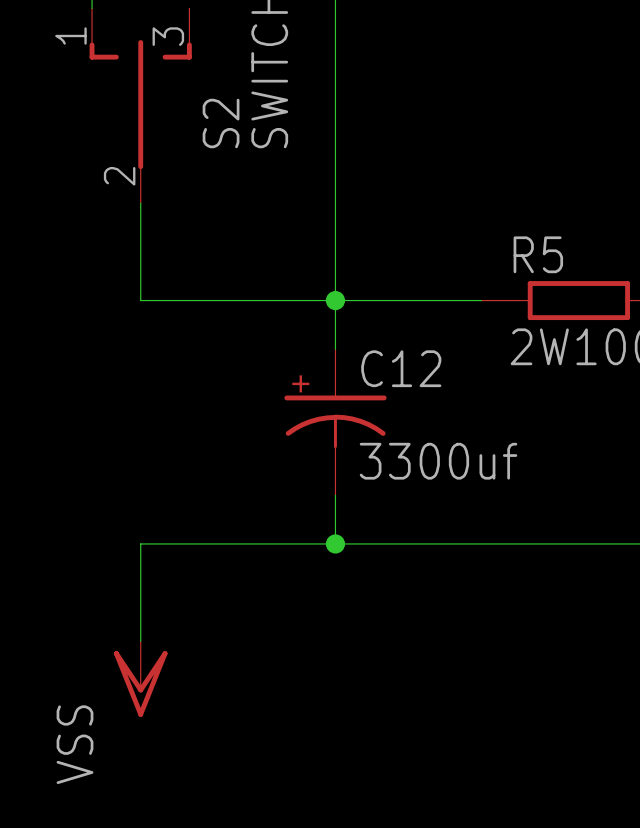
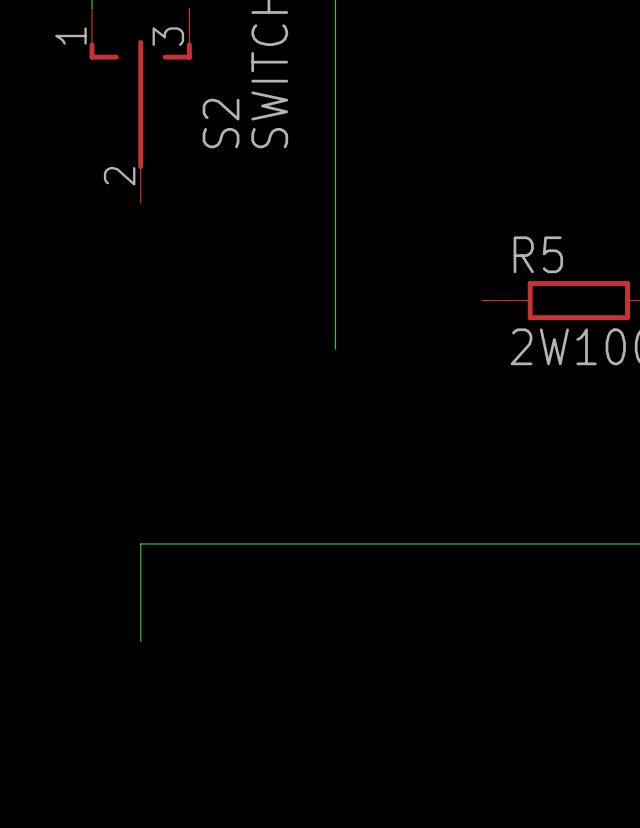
wire: (140, 203) (140, 300) (481, 300) -> none
junction: (335, 300) -> none
C12: 3300uf (335, 422) -> none
wire: (335, 495) (335, 543) -> none
junction: (335, 543) -> none
power symbol: VSS (140, 679) -> none

